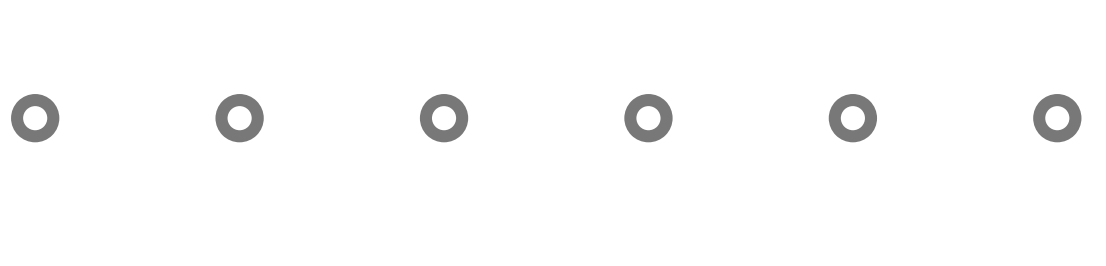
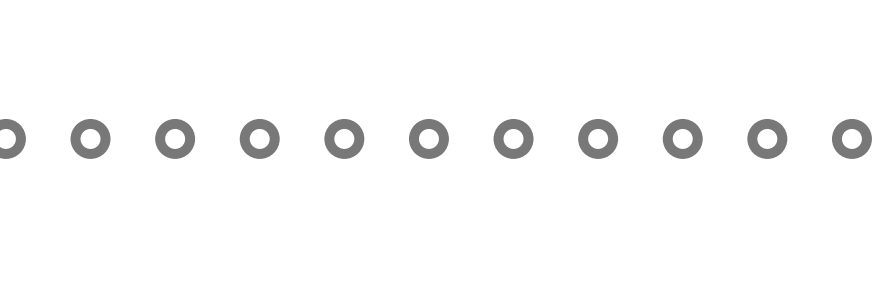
via: none -> (90, 138)
via: none -> (259, 138)
via: none -> (428, 138)
via: none -> (598, 138)
via: none -> (767, 138)

